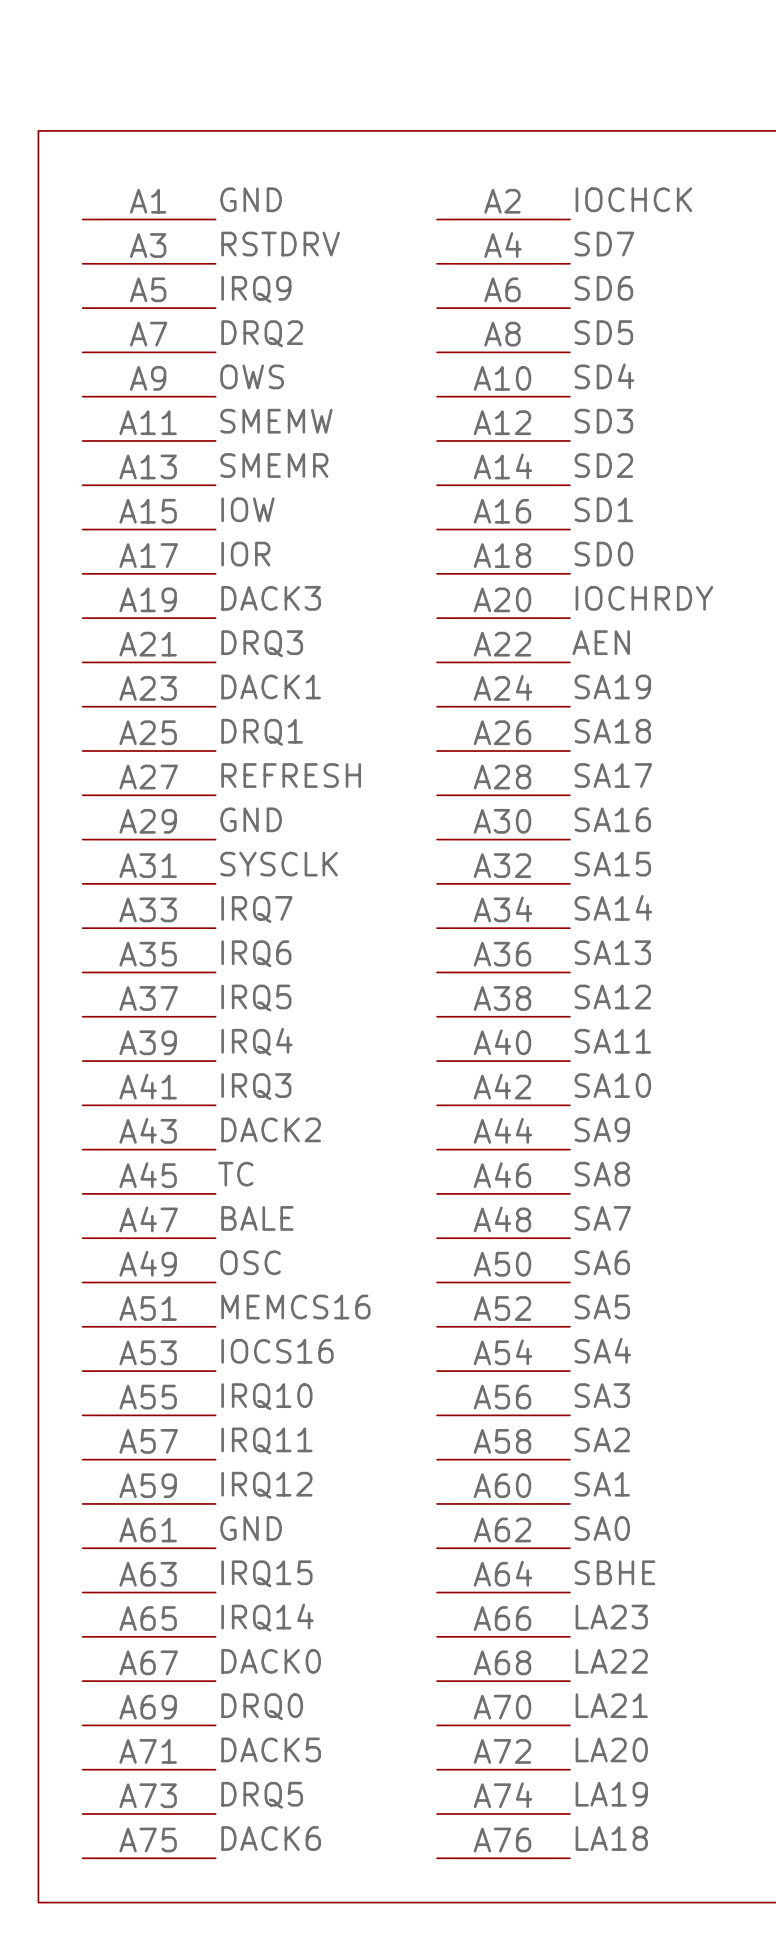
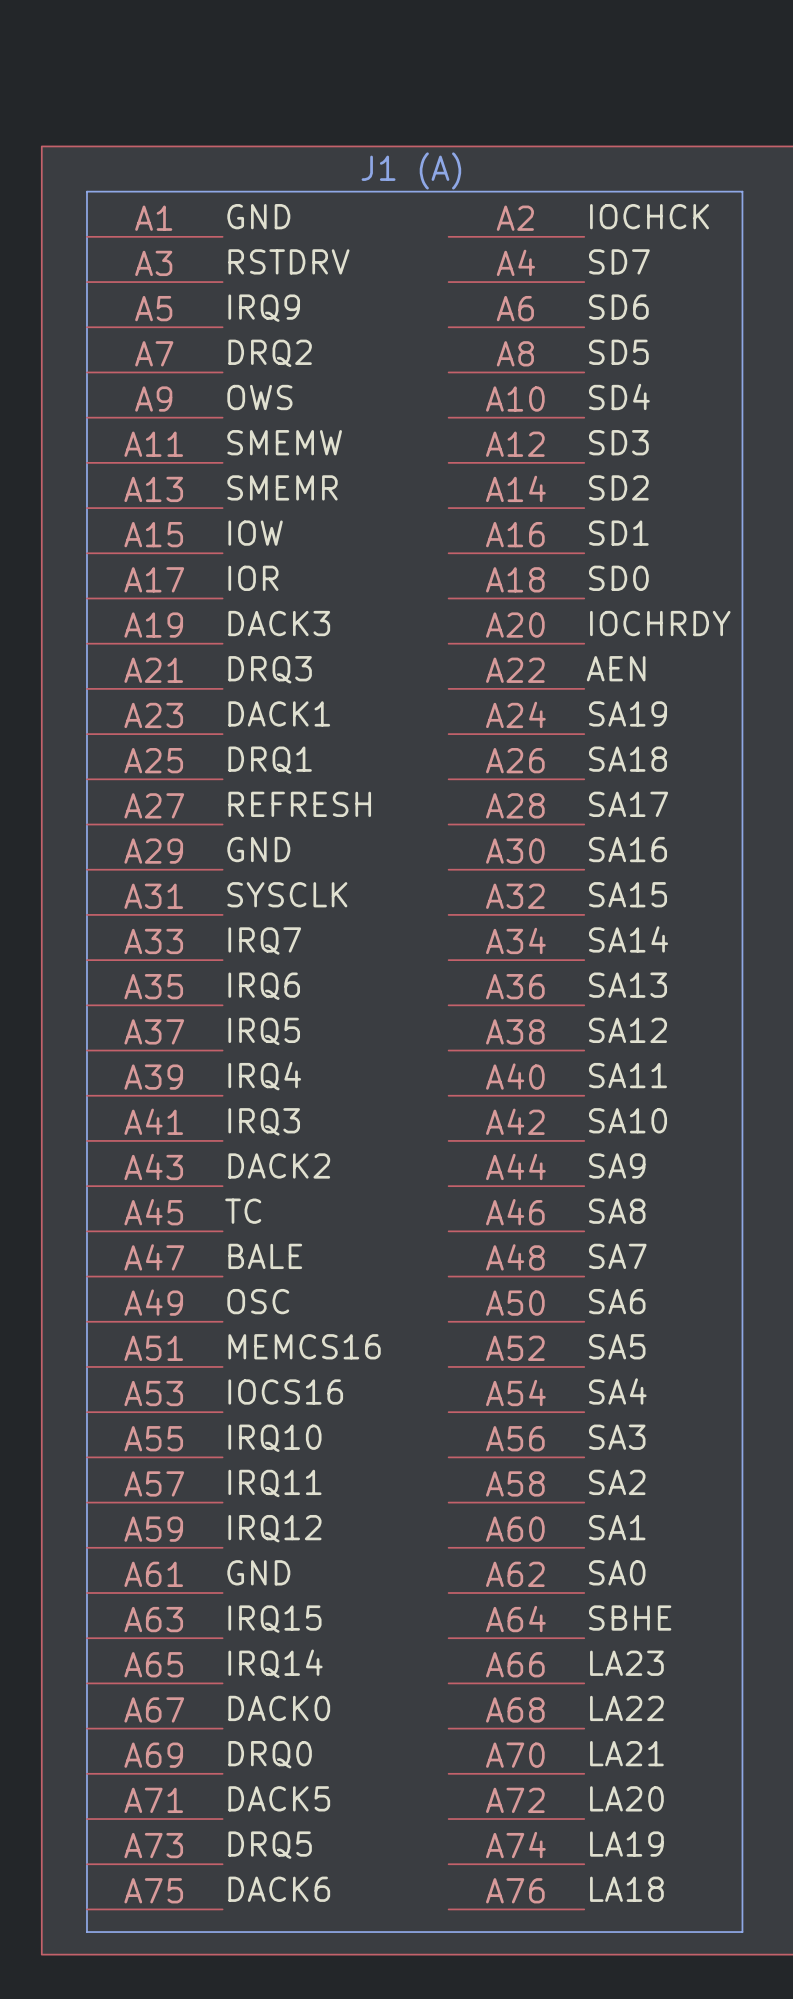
text: none -> J1 (A) (411, 170)
line: none -> (86, 191) (742, 191) (742, 1932) (86, 1932) (86, 191)

